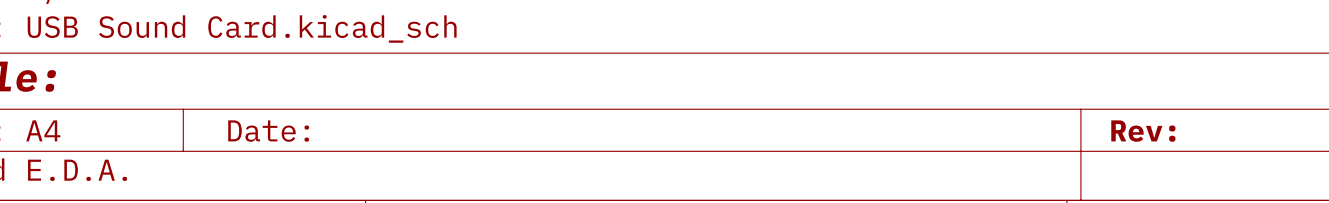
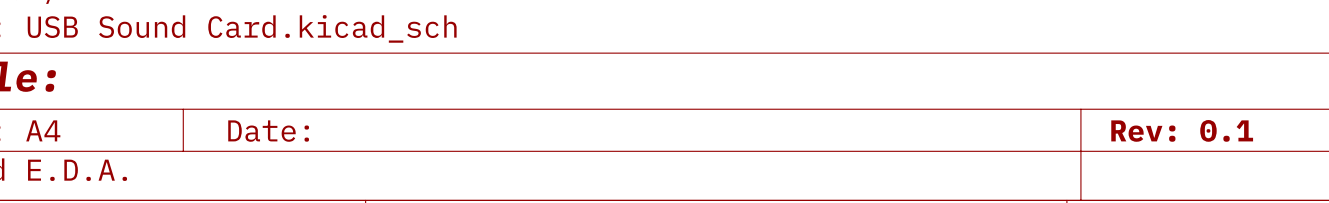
title block: Rev: (1143, 131) -> Rev: 0.1 (1182, 130)

